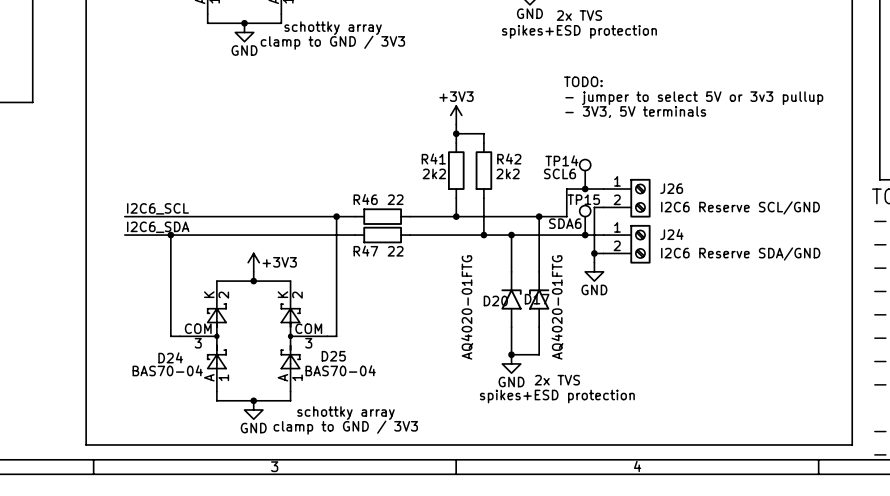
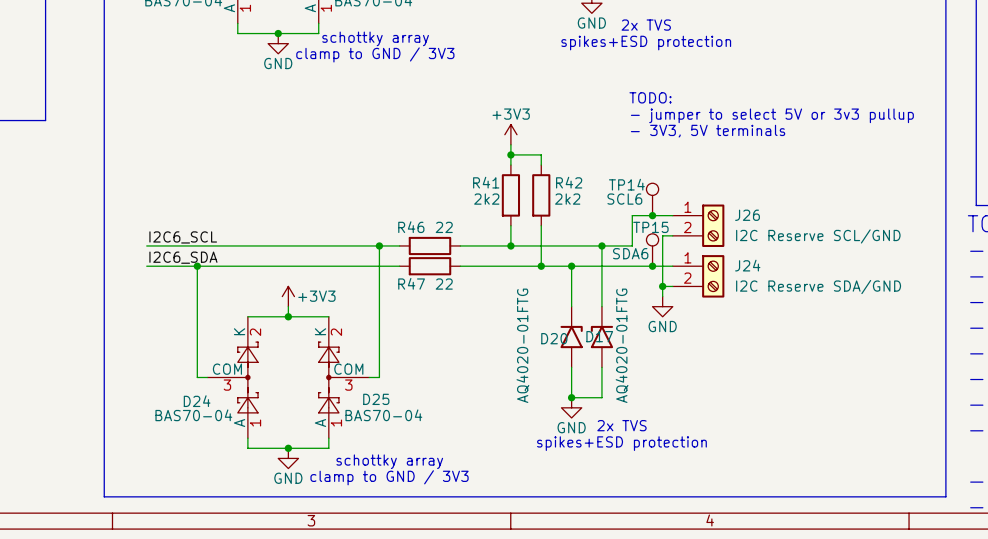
J26 value: I2C6 Reserve SCL/GND (740, 207) -> I2C Reserve SCL/GND (818, 236)
J24 value: I2C6 Reserve SDA/GND (740, 253) -> I2C Reserve SDA/GND (818, 287)

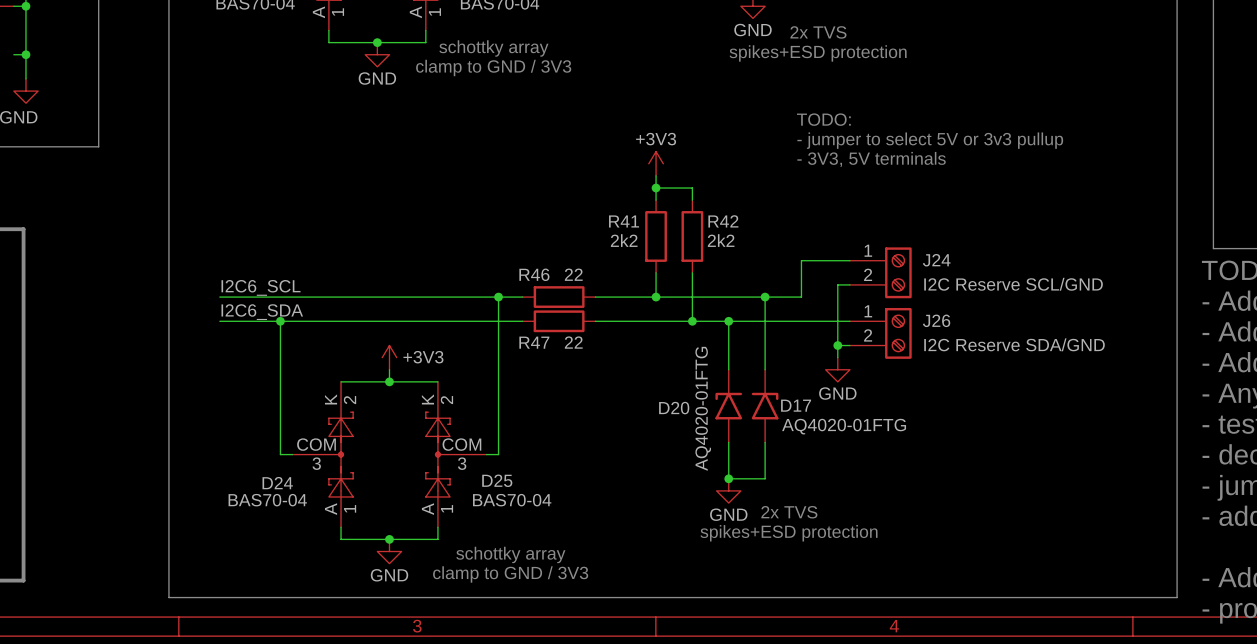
TP14: SCL6 (652, 199) -> none
junction: (652, 215) -> none
J26 name: J26 (747, 215) -> J24 (936, 260)
TP15: SDA6 (652, 250) -> none
J24 name: J24 (747, 265) -> J26 (936, 320)
junction: (652, 266) -> none
D17 position: (571, 337) -> (765, 406)
D20 position: (601, 337) -> (728, 406)
D17 value rotation: 0° (522, 345) -> 90° clockwise (844, 426)
D20 value position: AQ4020-01FTG (622, 345) -> AQ4020-01FTG (703, 408)

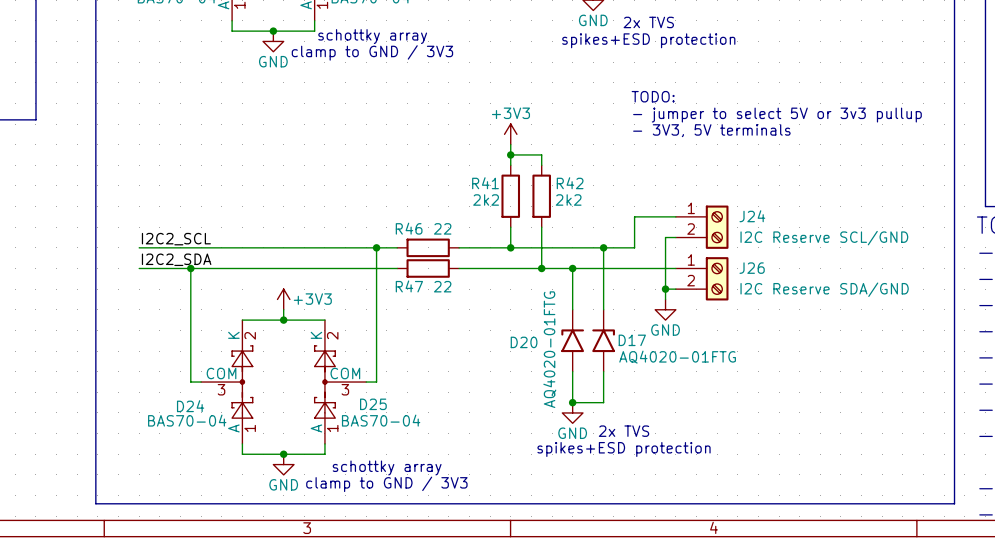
label: I2C6_SCL (261, 287) -> I2C2_SCL (176, 239)
label: I2C6_SDA (262, 312) -> I2C2_SDA (176, 259)

